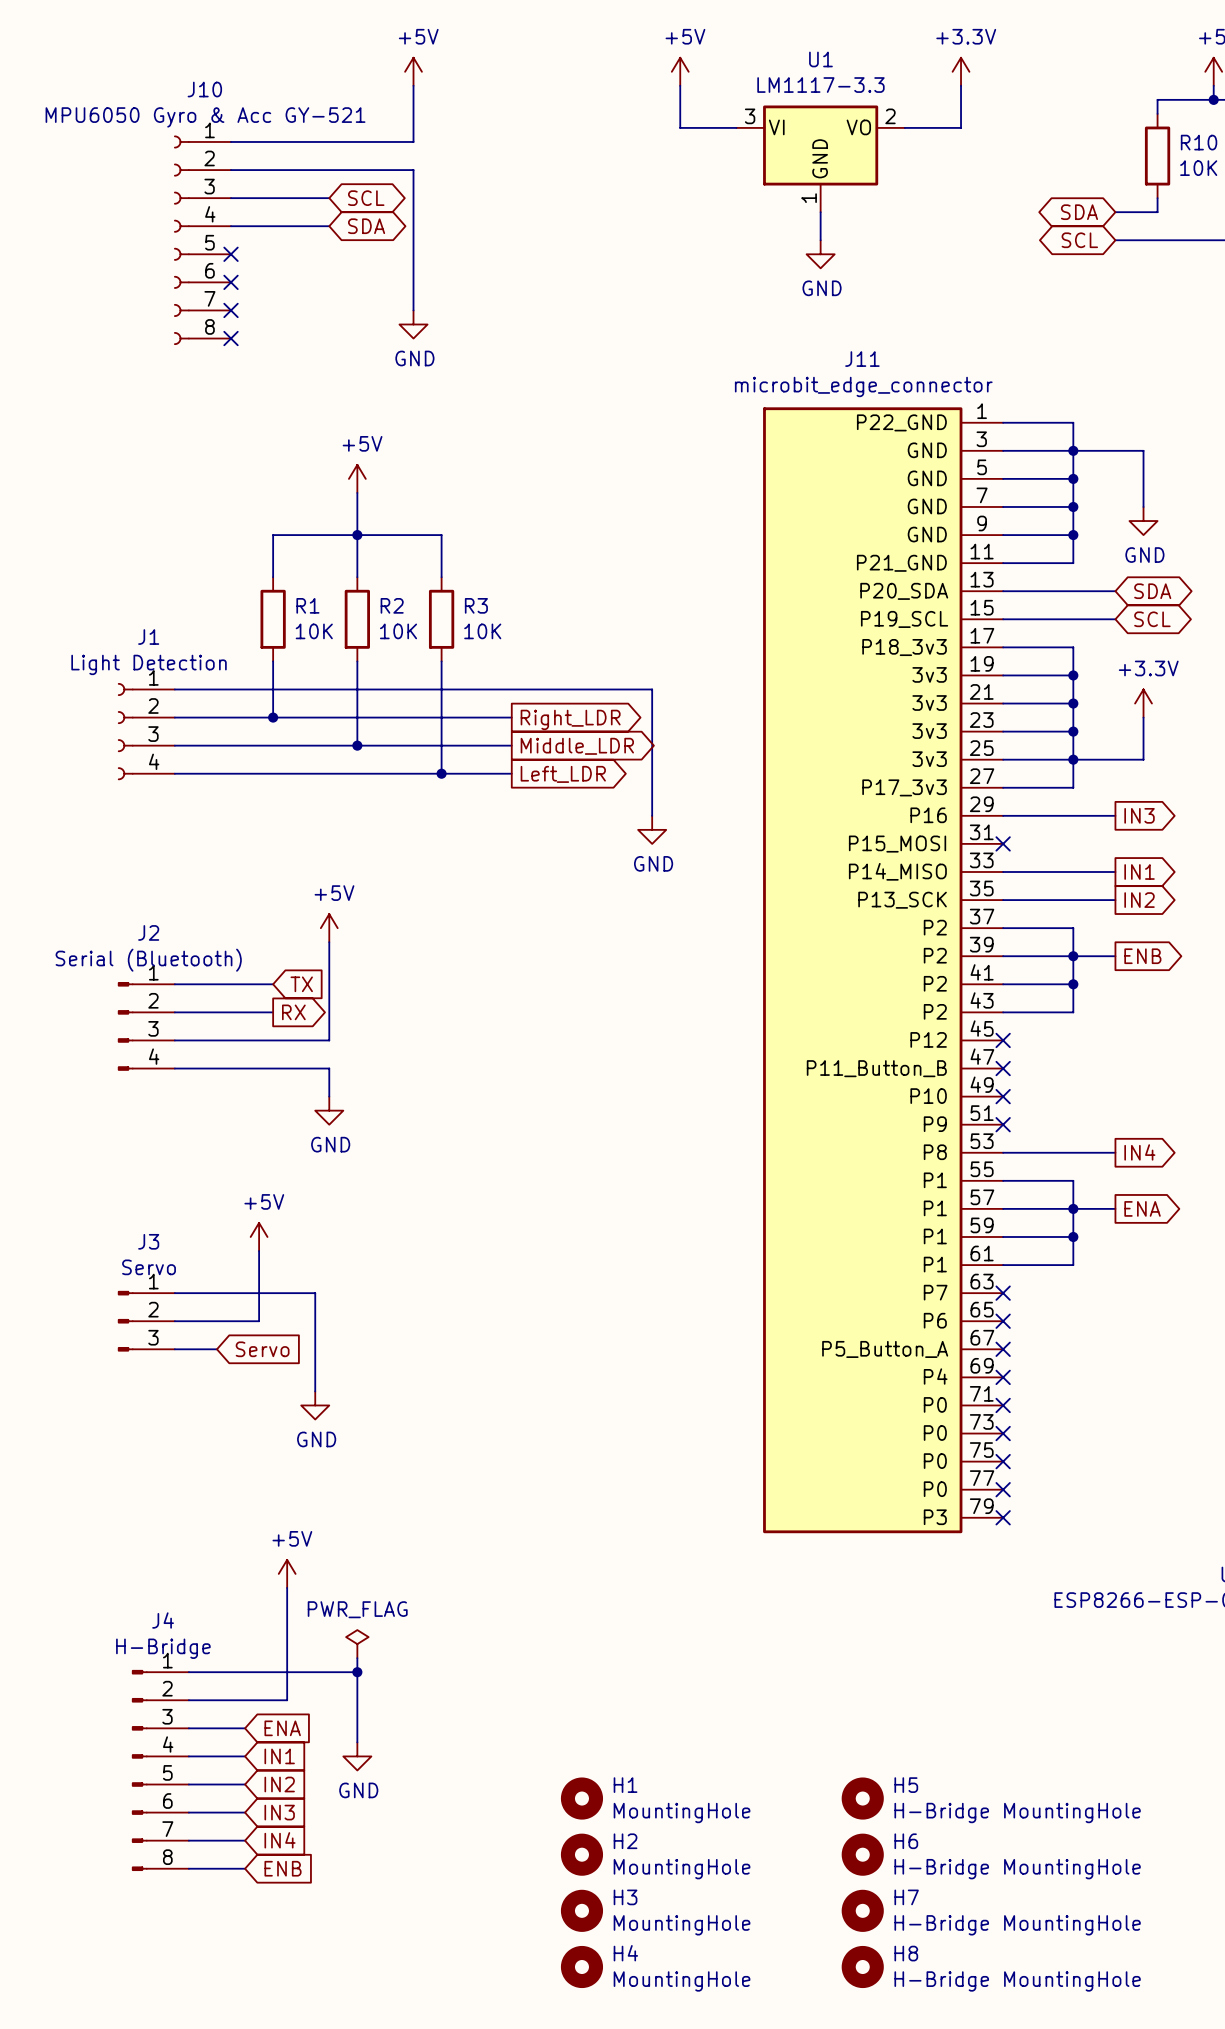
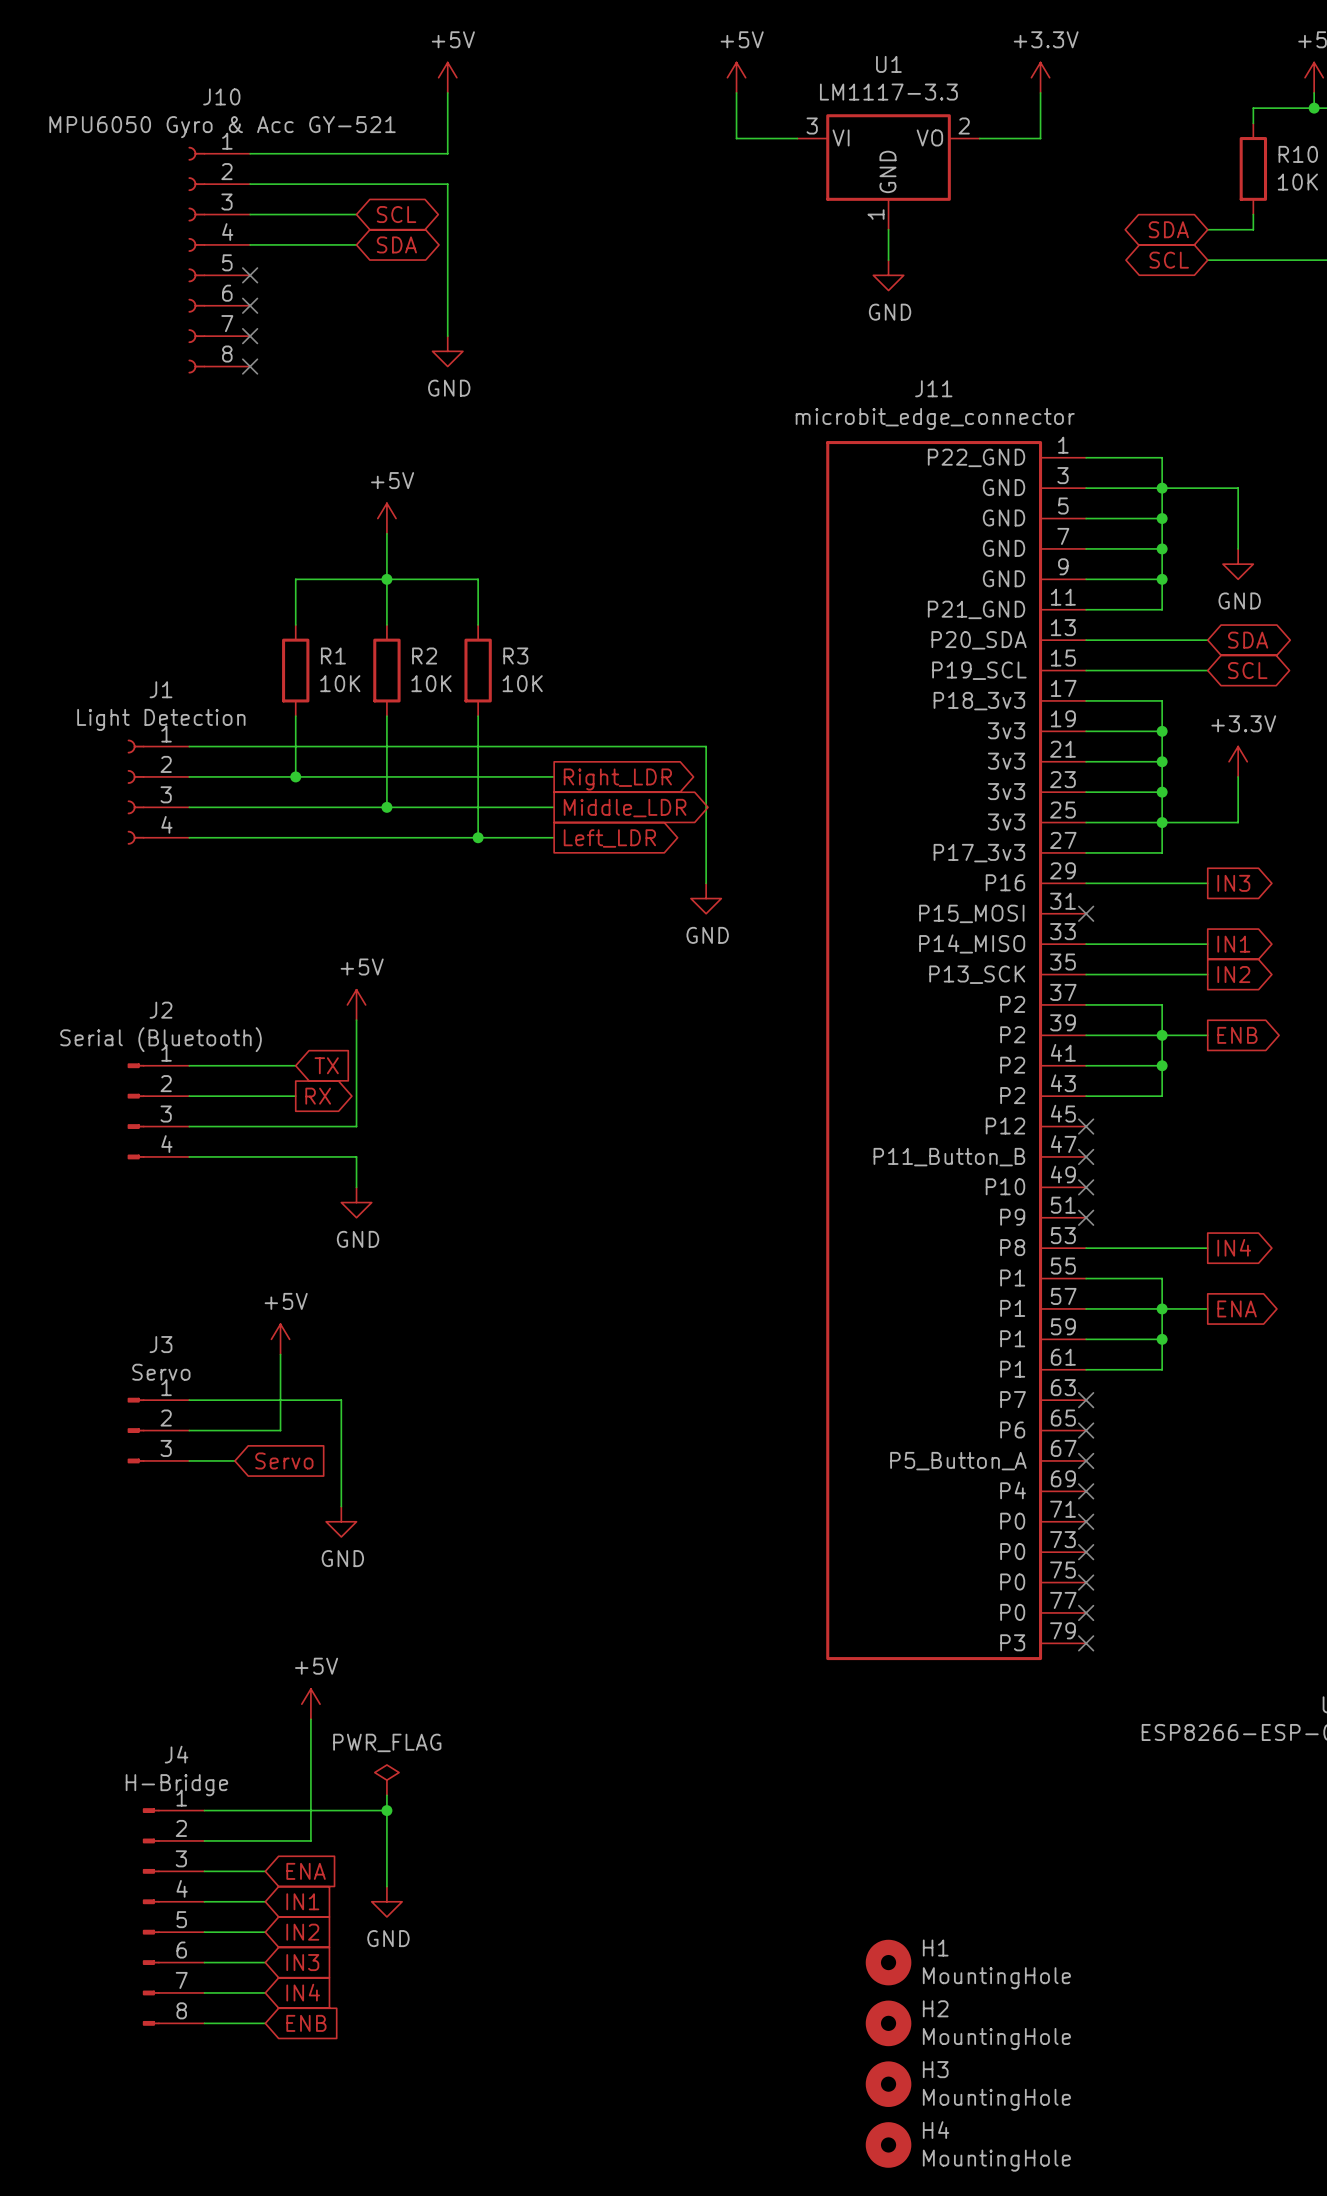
H1 position: (581, 1798) -> (888, 1962)
H5: H-Bridge MountingHole (862, 1798) -> none
H2 position: (581, 1854) -> (888, 2023)
H6: H-Bridge MountingHole (862, 1854) -> none
H3 position: (581, 1910) -> (888, 2084)
H7: H-Bridge MountingHole (862, 1910) -> none
H4 position: (581, 1967) -> (888, 2144)
H8: H-Bridge MountingHole (862, 1967) -> none

